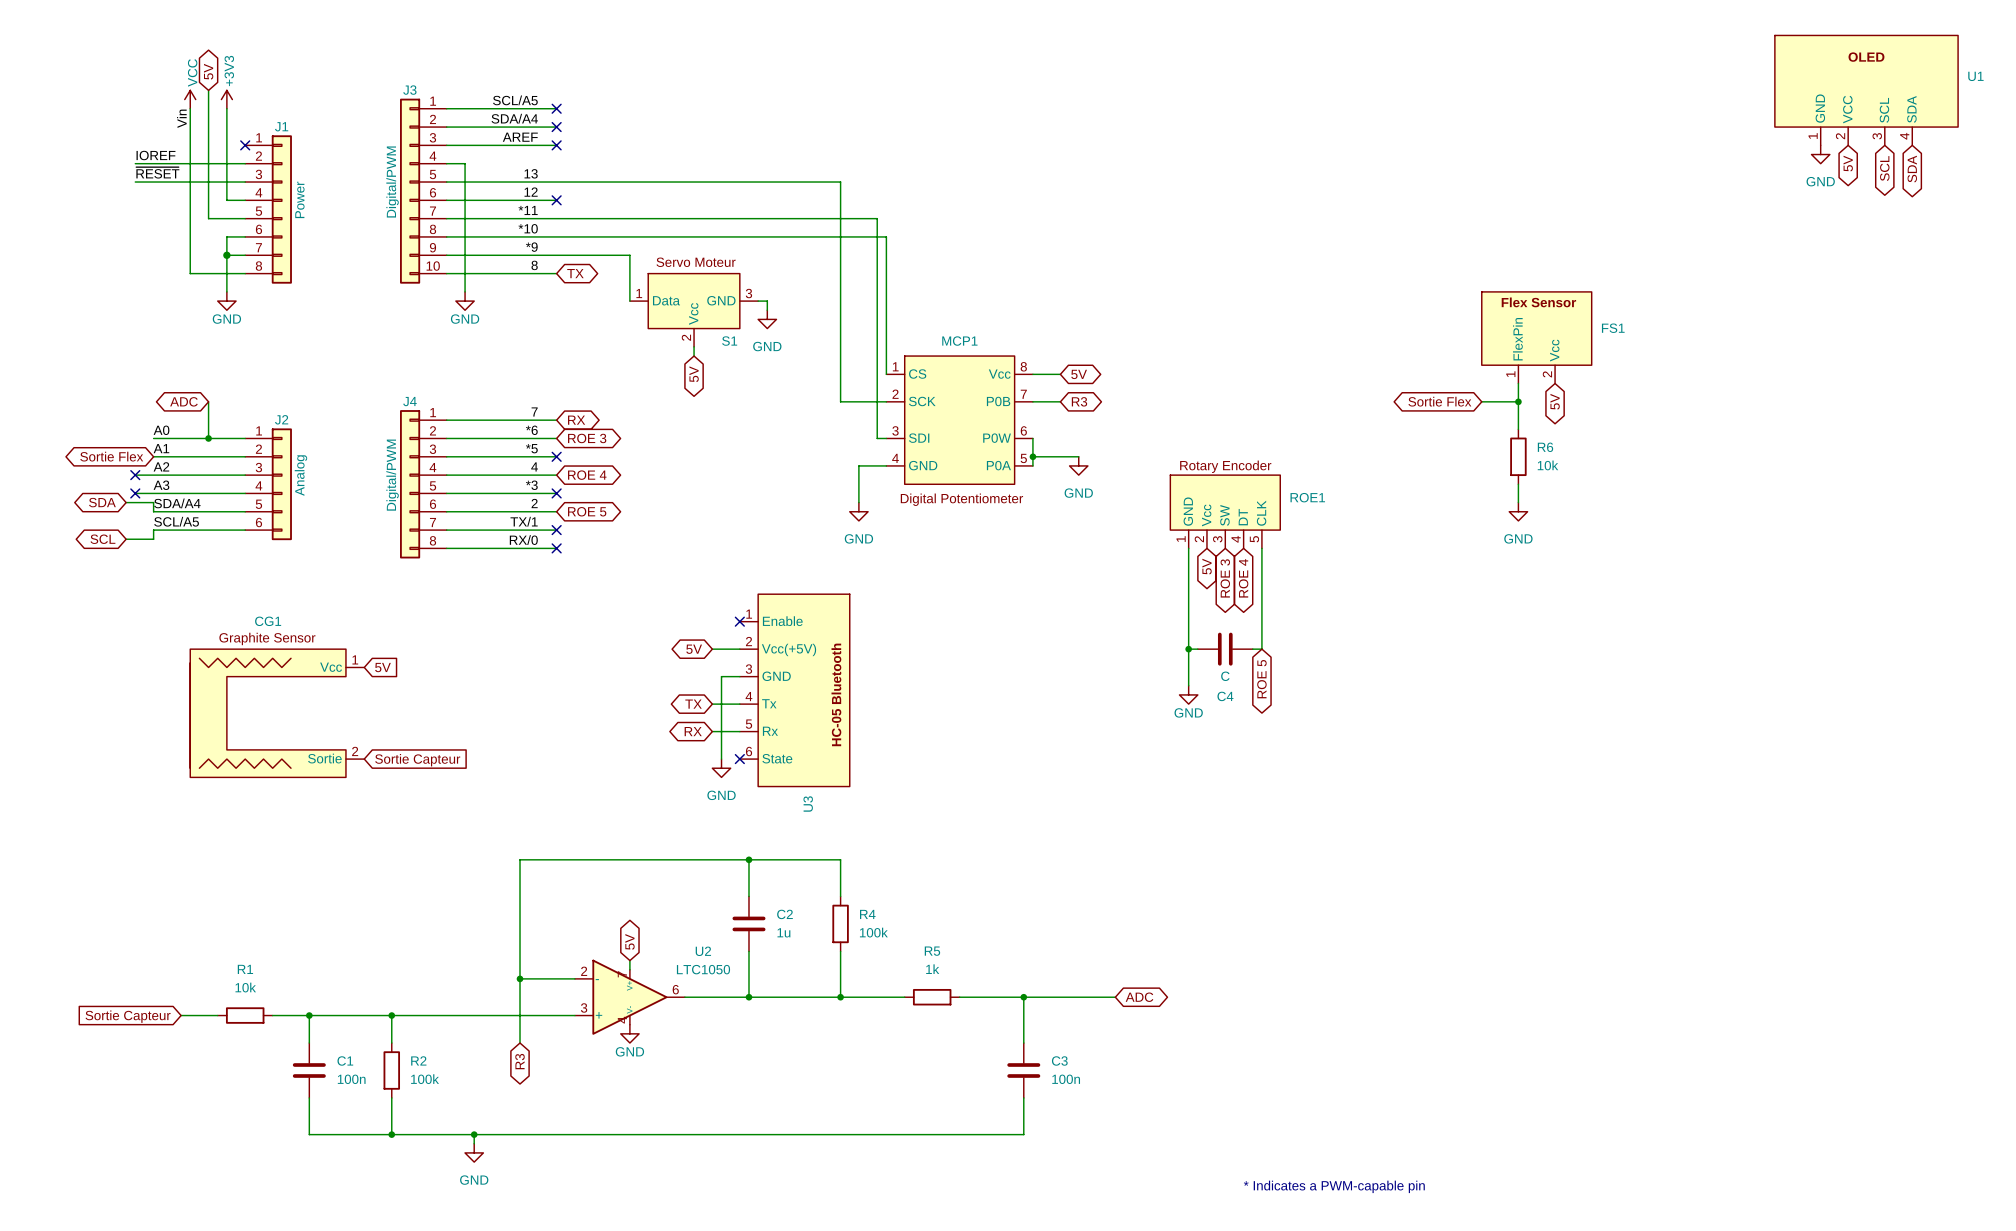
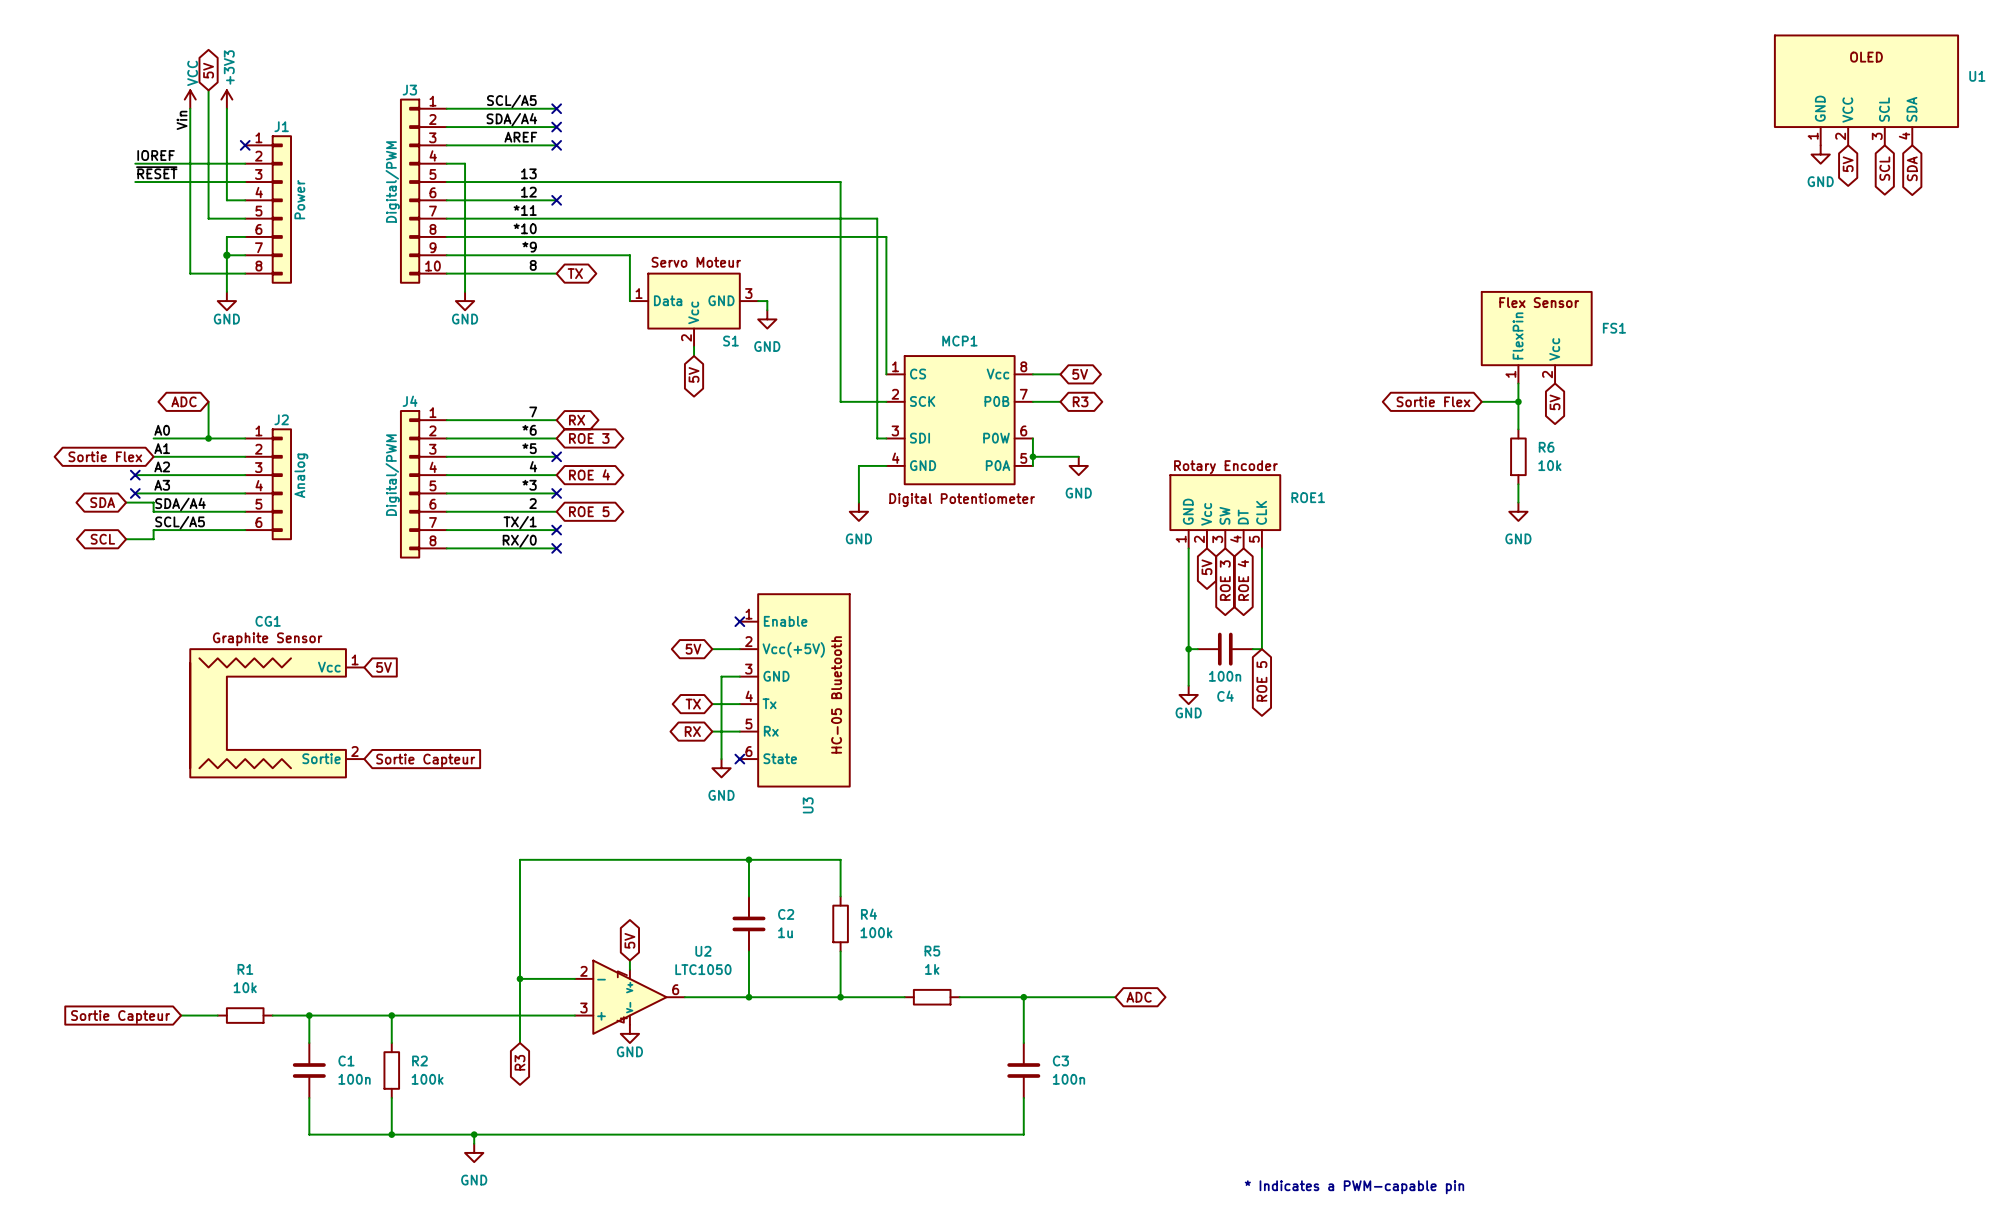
C4 value: C (1225, 676) -> 100n (1225, 676)

